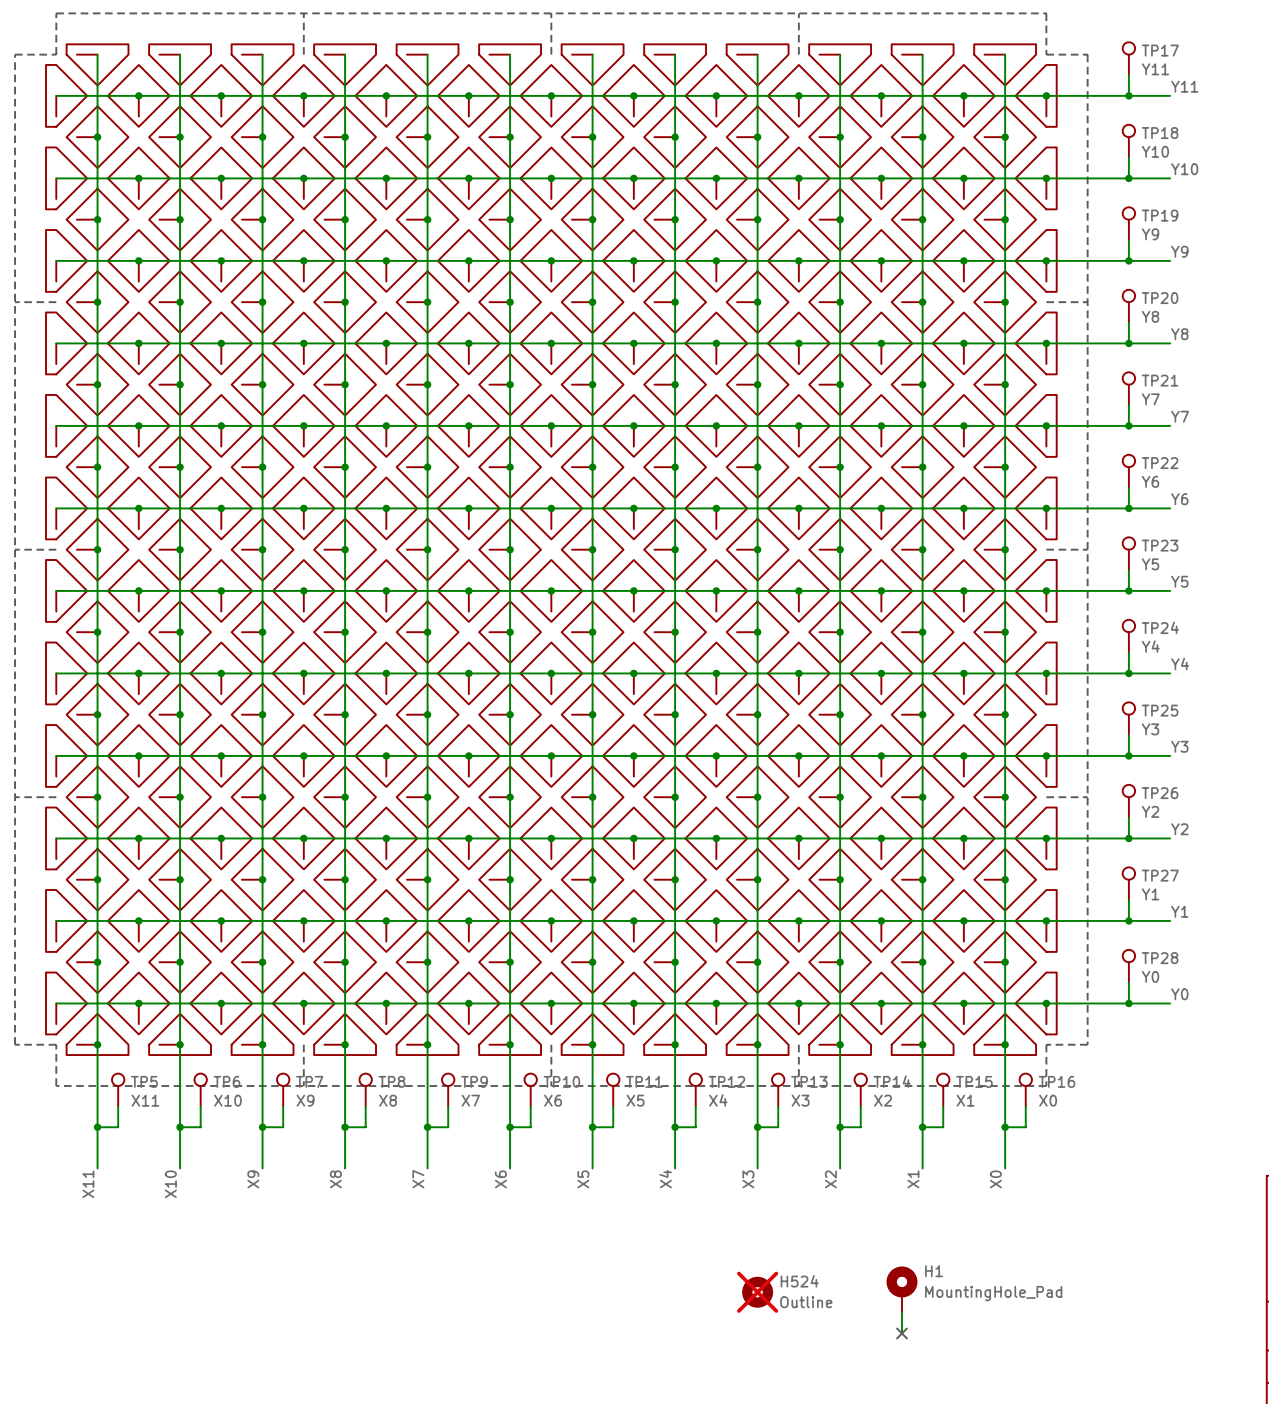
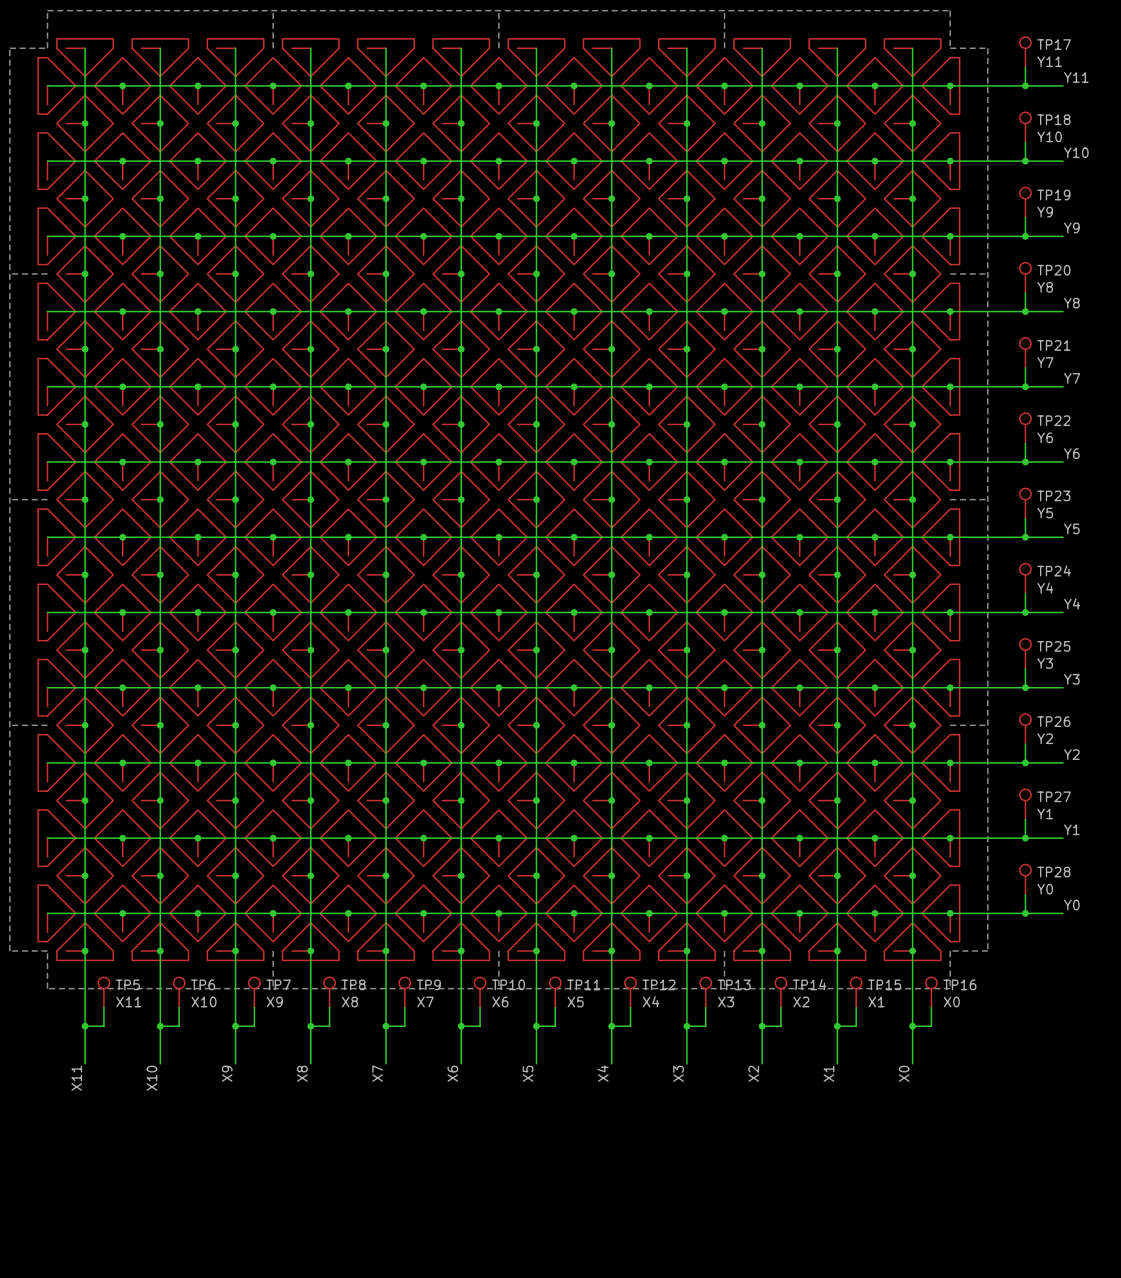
H1: MountingHole_Pad (901, 1289) -> none
H524: Outline (757, 1292) -> none
wire: (901, 1312) (901, 1333) -> none
no-connect mark: (901, 1333) -> none

